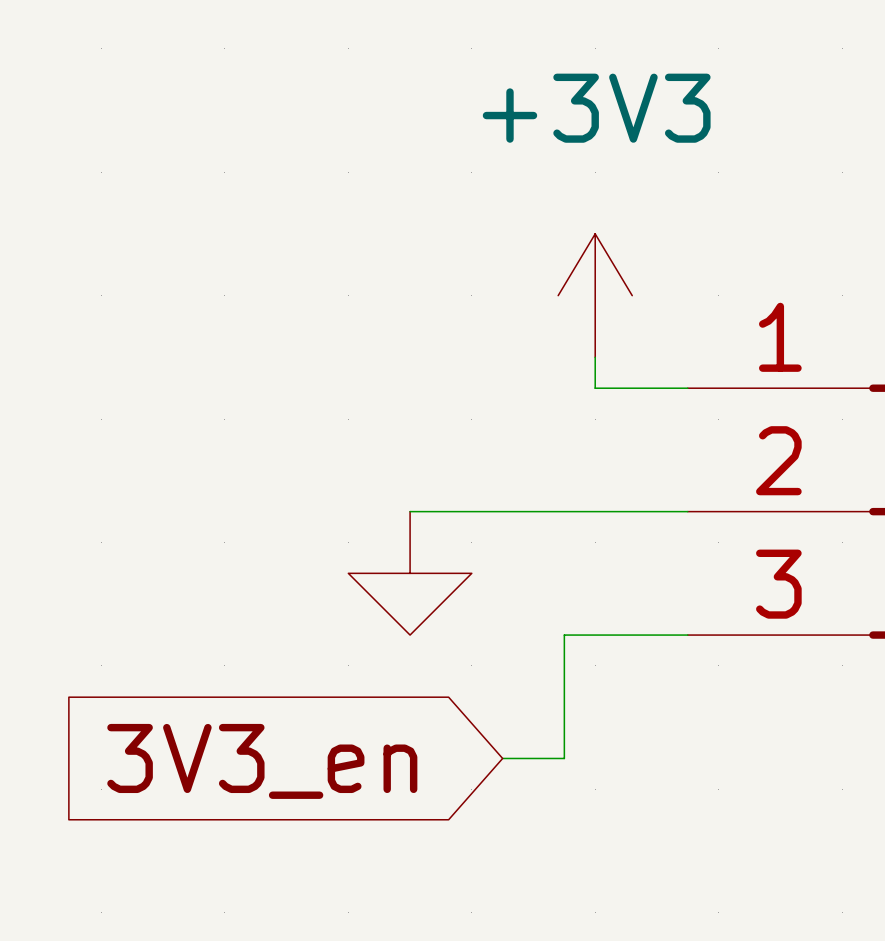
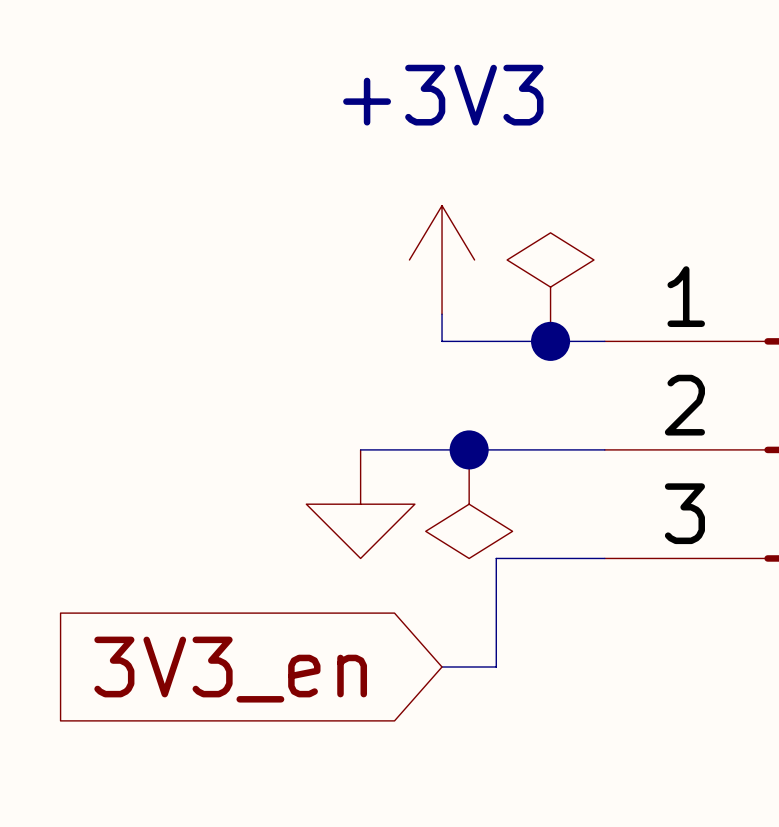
power symbol text: +3V3 (596, 108) -> none
power symbol shape: [558, 233, 633, 358] -> [507, 232, 594, 342]
power symbol: none -> +3V3 (442, 259)
wire: (595, 357) (595, 388) -> (442, 314) (442, 341) (523, 341)
junction: none -> (550, 341)
junction: none -> (469, 449)
power symbol: none -> (469, 504)

